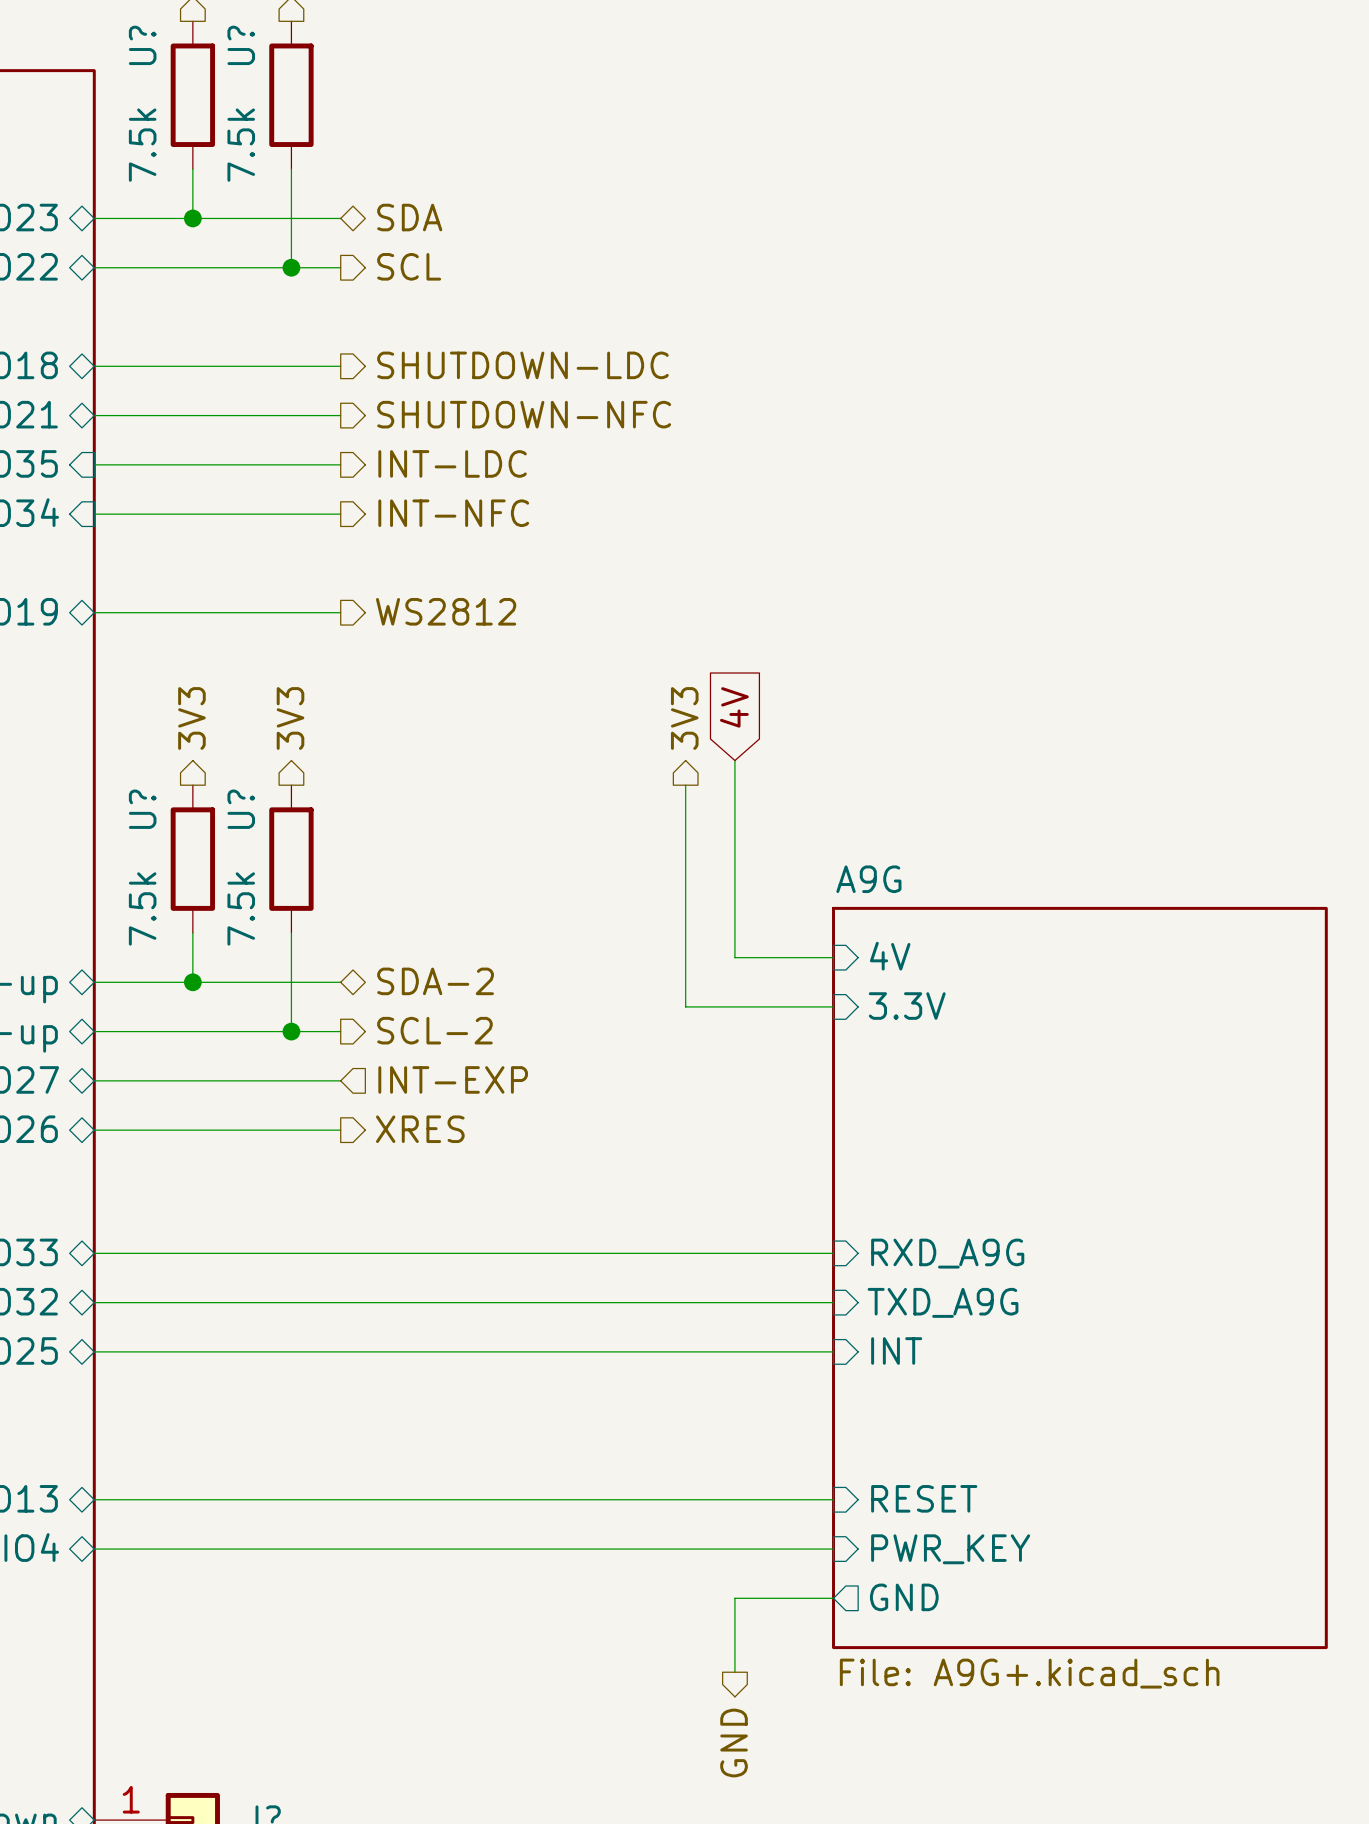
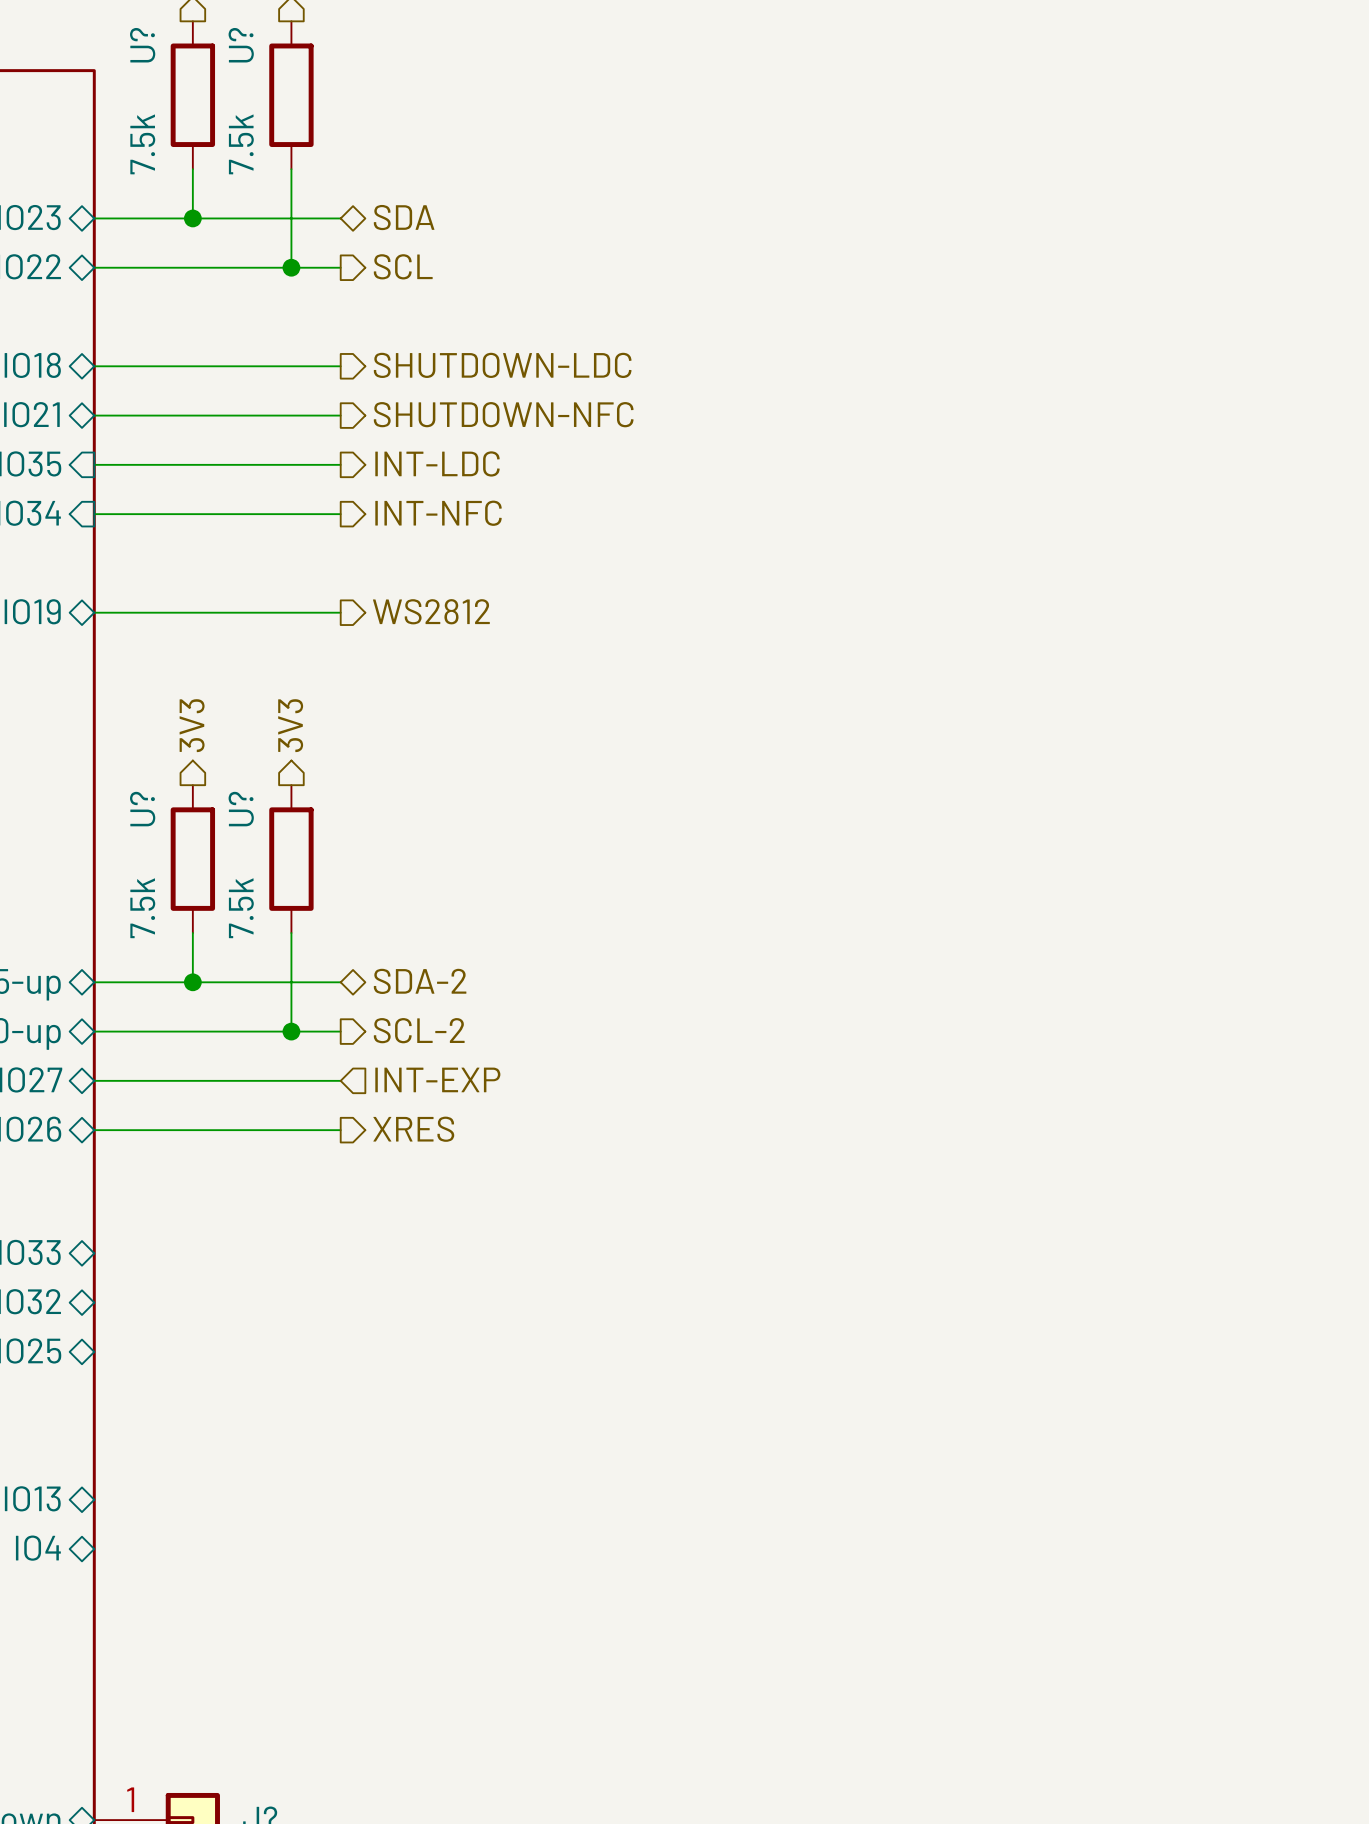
global label: 4V (734, 707) -> none
hierarchical label: 3V3 (684, 718) -> none
wire: (734, 760) (734, 957) (833, 957) -> none
wire: (685, 785) (685, 1006) (833, 1006) -> none
sheet pin: 4V (890, 956) -> none
sheet pin: 3.3V (907, 1006) -> none
wire: (94, 1253) (833, 1253) -> none
sheet pin: RXD_A9G (947, 1253) -> none
sheet A9G: File: A9G+.kicad_sch (1079, 1277) -> none
wire: (94, 1302) (833, 1302) -> none
sheet pin: TXD_A9G (943, 1302) -> none
sheet pin: INT (896, 1350) -> none
wire: (94, 1351) (833, 1351) -> none
sheet pin: RESET (924, 1498) -> none
wire: (94, 1499) (833, 1499) -> none
wire: (94, 1549) (833, 1549) -> none
sheet pin: PWR_KEY (950, 1549) -> none
sheet pin: GND (904, 1597) -> none
wire: (833, 1598) (734, 1598) (734, 1672) -> none
hierarchical label: GND (734, 1743) -> none

